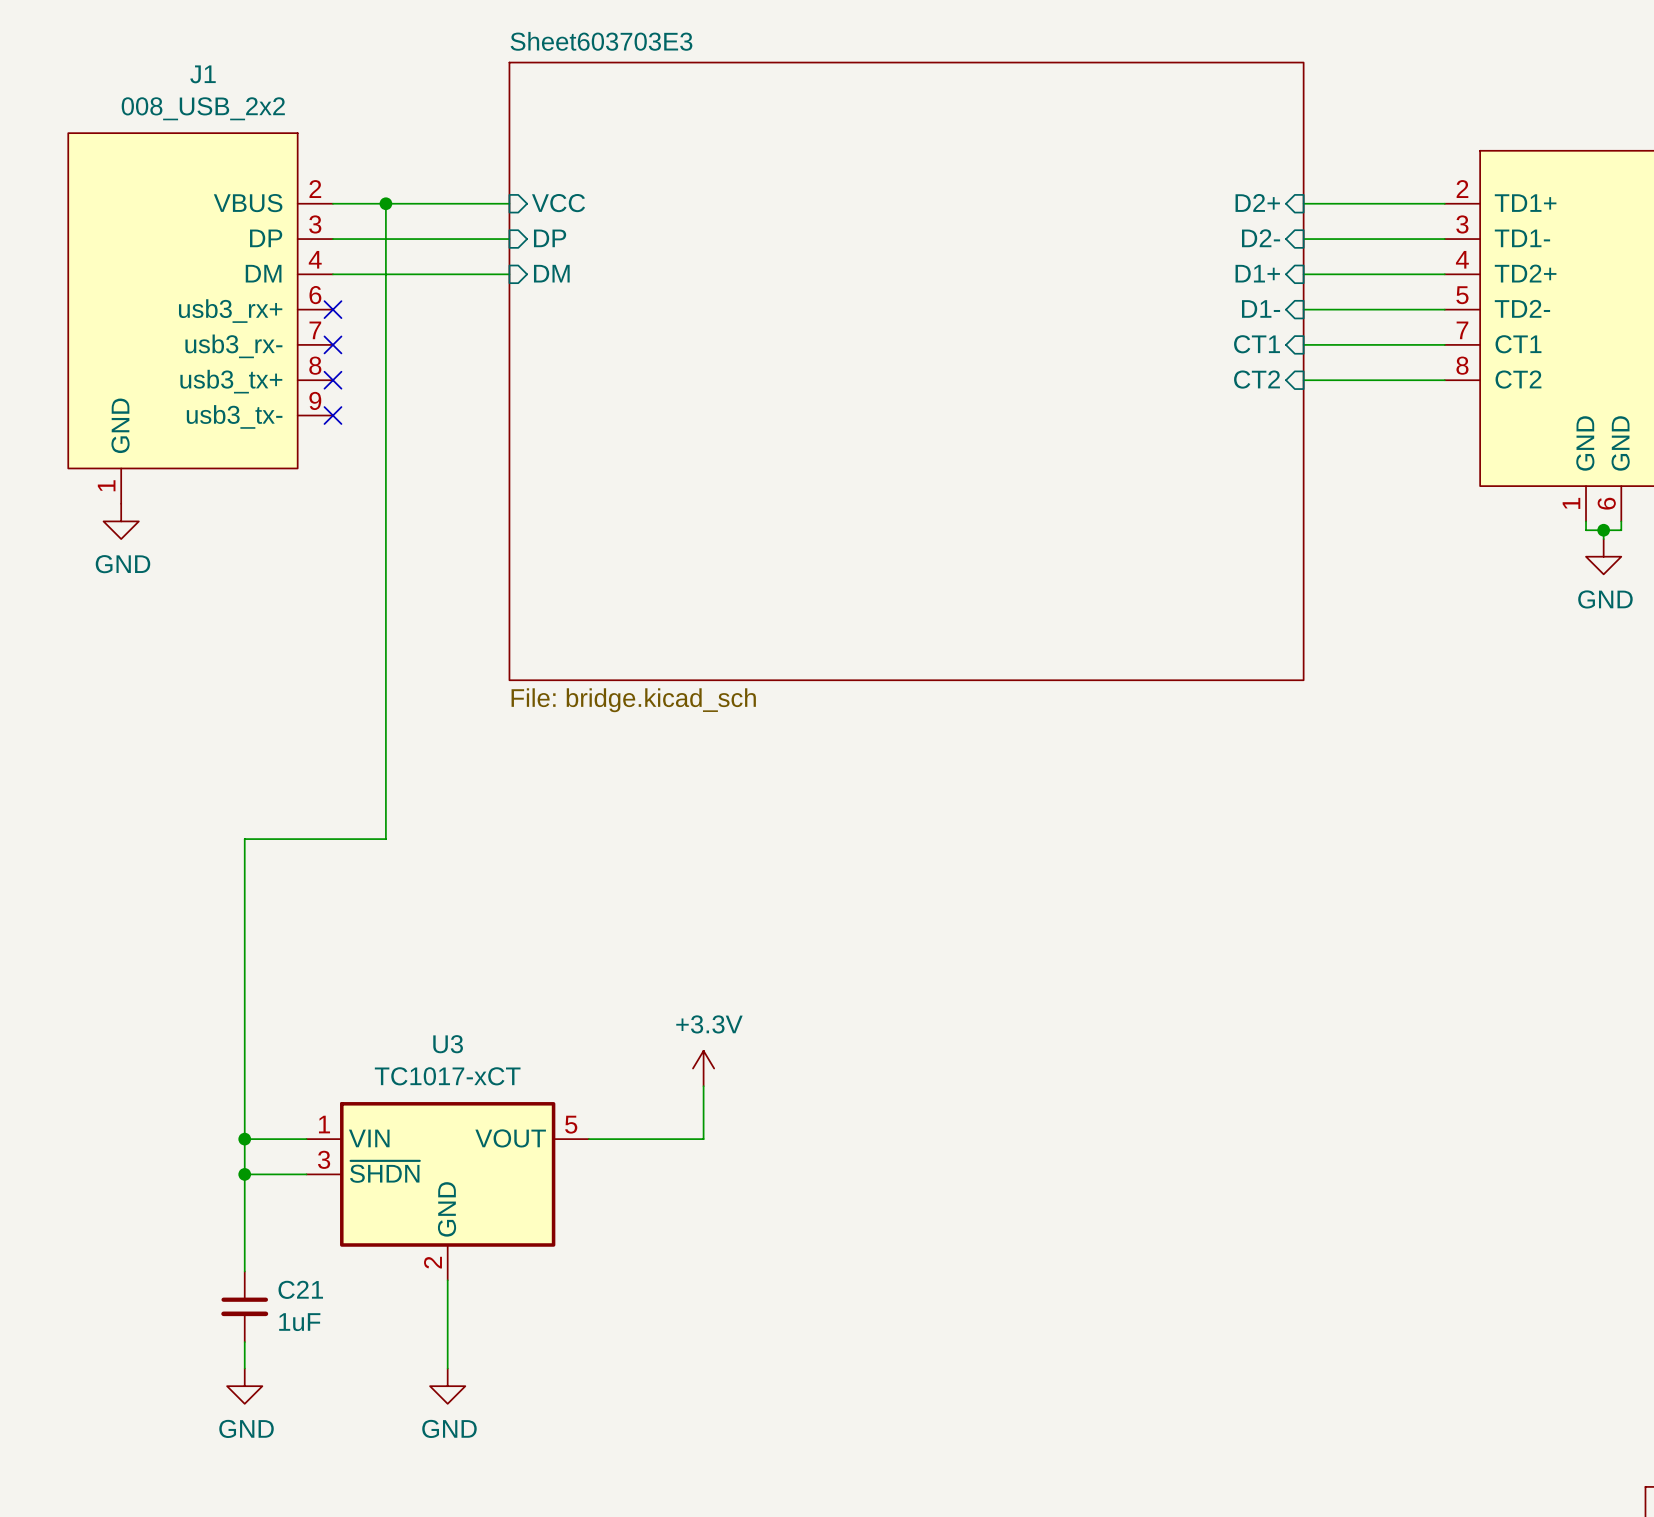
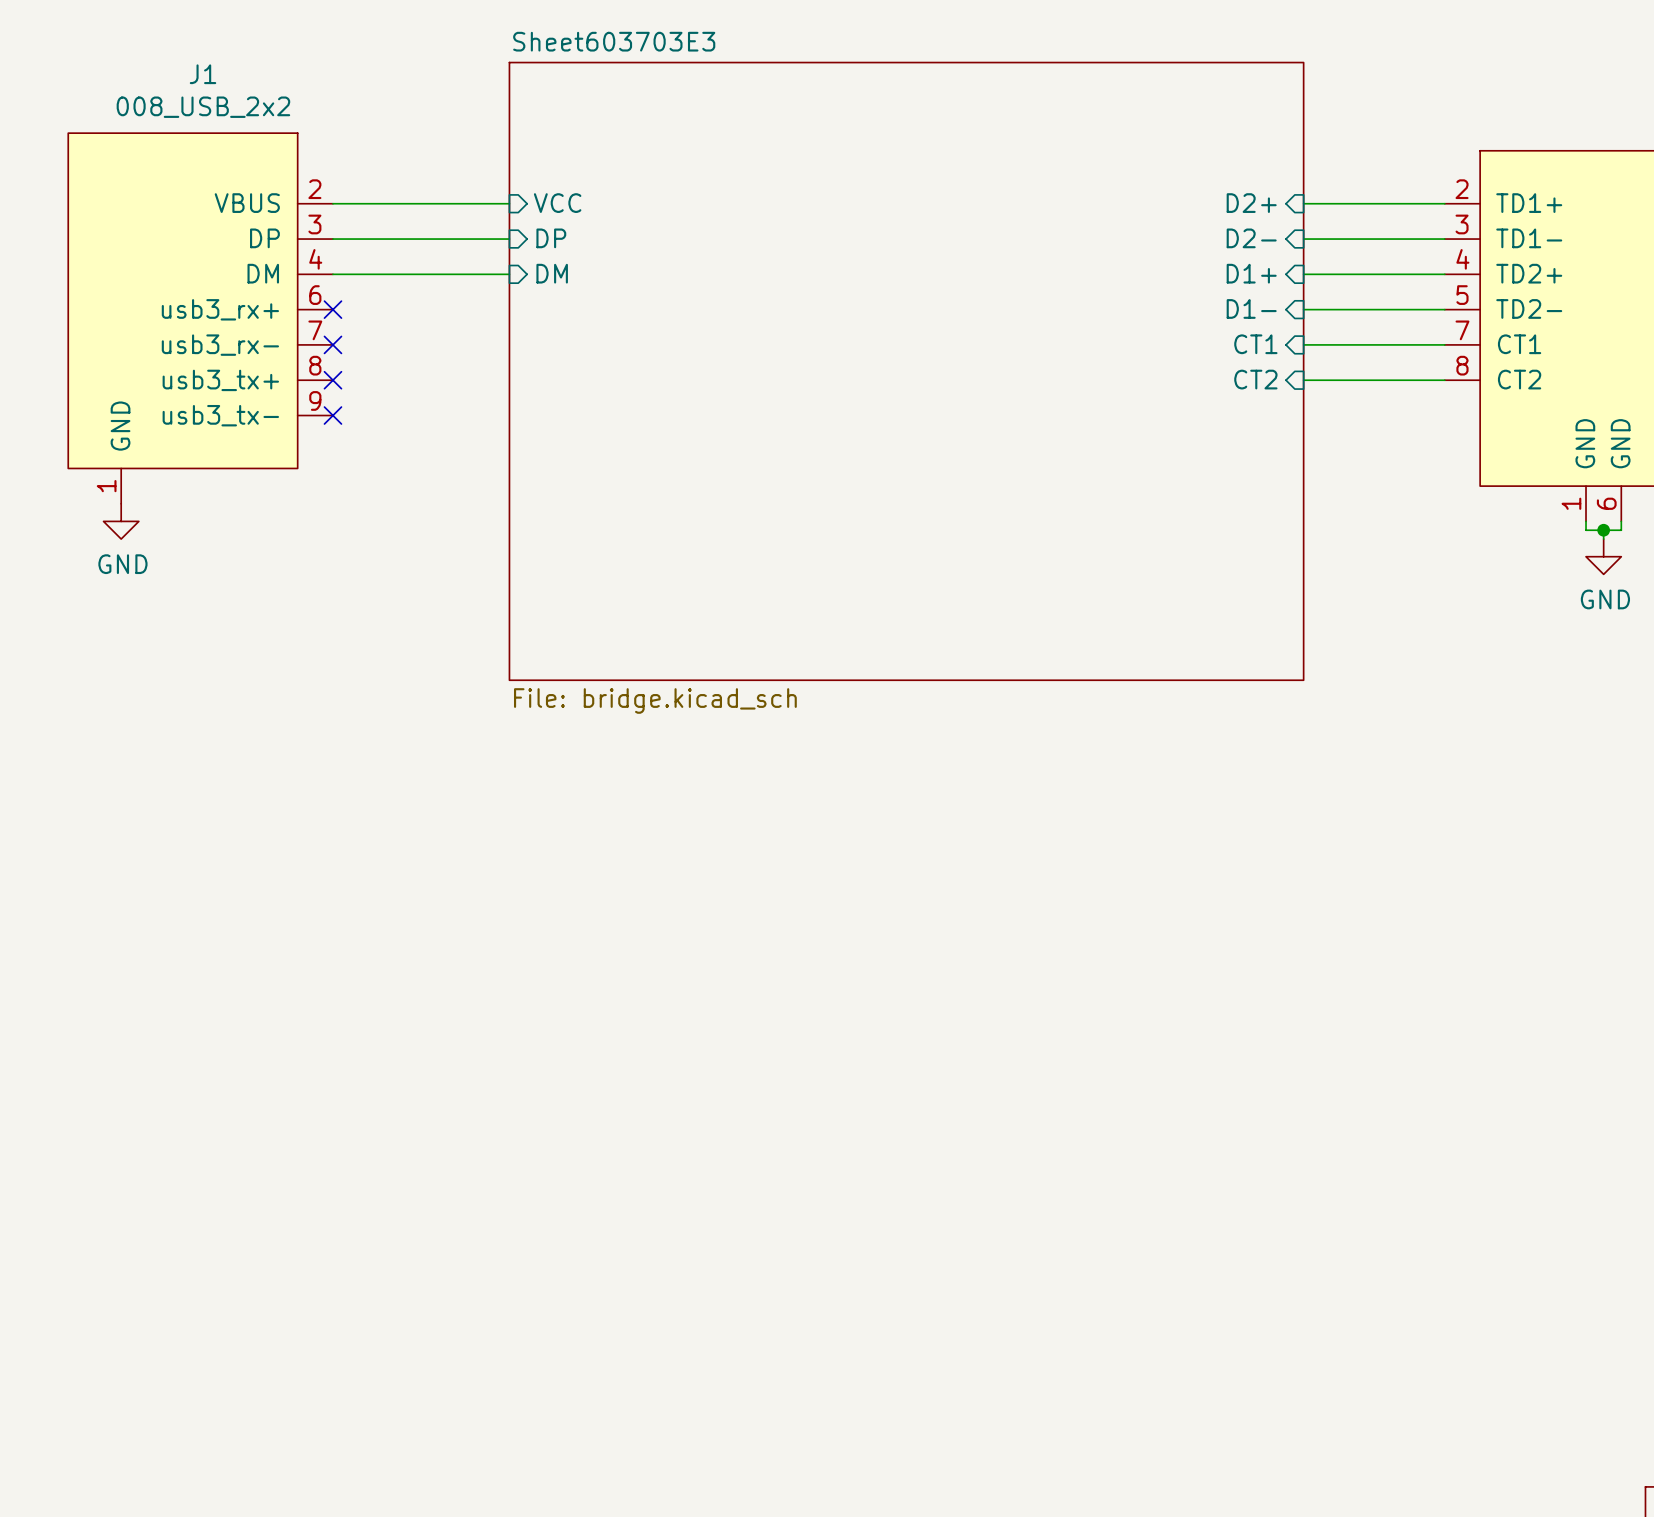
wire: (385, 203) (385, 839) (244, 839) (244, 1271) -> none
junction: (385, 203) -> none
power symbol: +3.3V (703, 1068) -> none
wire: (703, 1086) (703, 1139) (588, 1139) -> none
wire: (244, 1139) (306, 1139) -> none
junction: (244, 1139) -> none
wire: (244, 1174) (306, 1174) -> none
junction: (244, 1174) -> none
U3: TC1017-xCT (447, 1191) -> none
wire: (447, 1280) (447, 1368) -> none
C21: 1uF (244, 1306) -> none
wire: (244, 1342) (244, 1368) -> none
power symbol: GND (244, 1386) -> none
power symbol: GND (447, 1386) -> none

